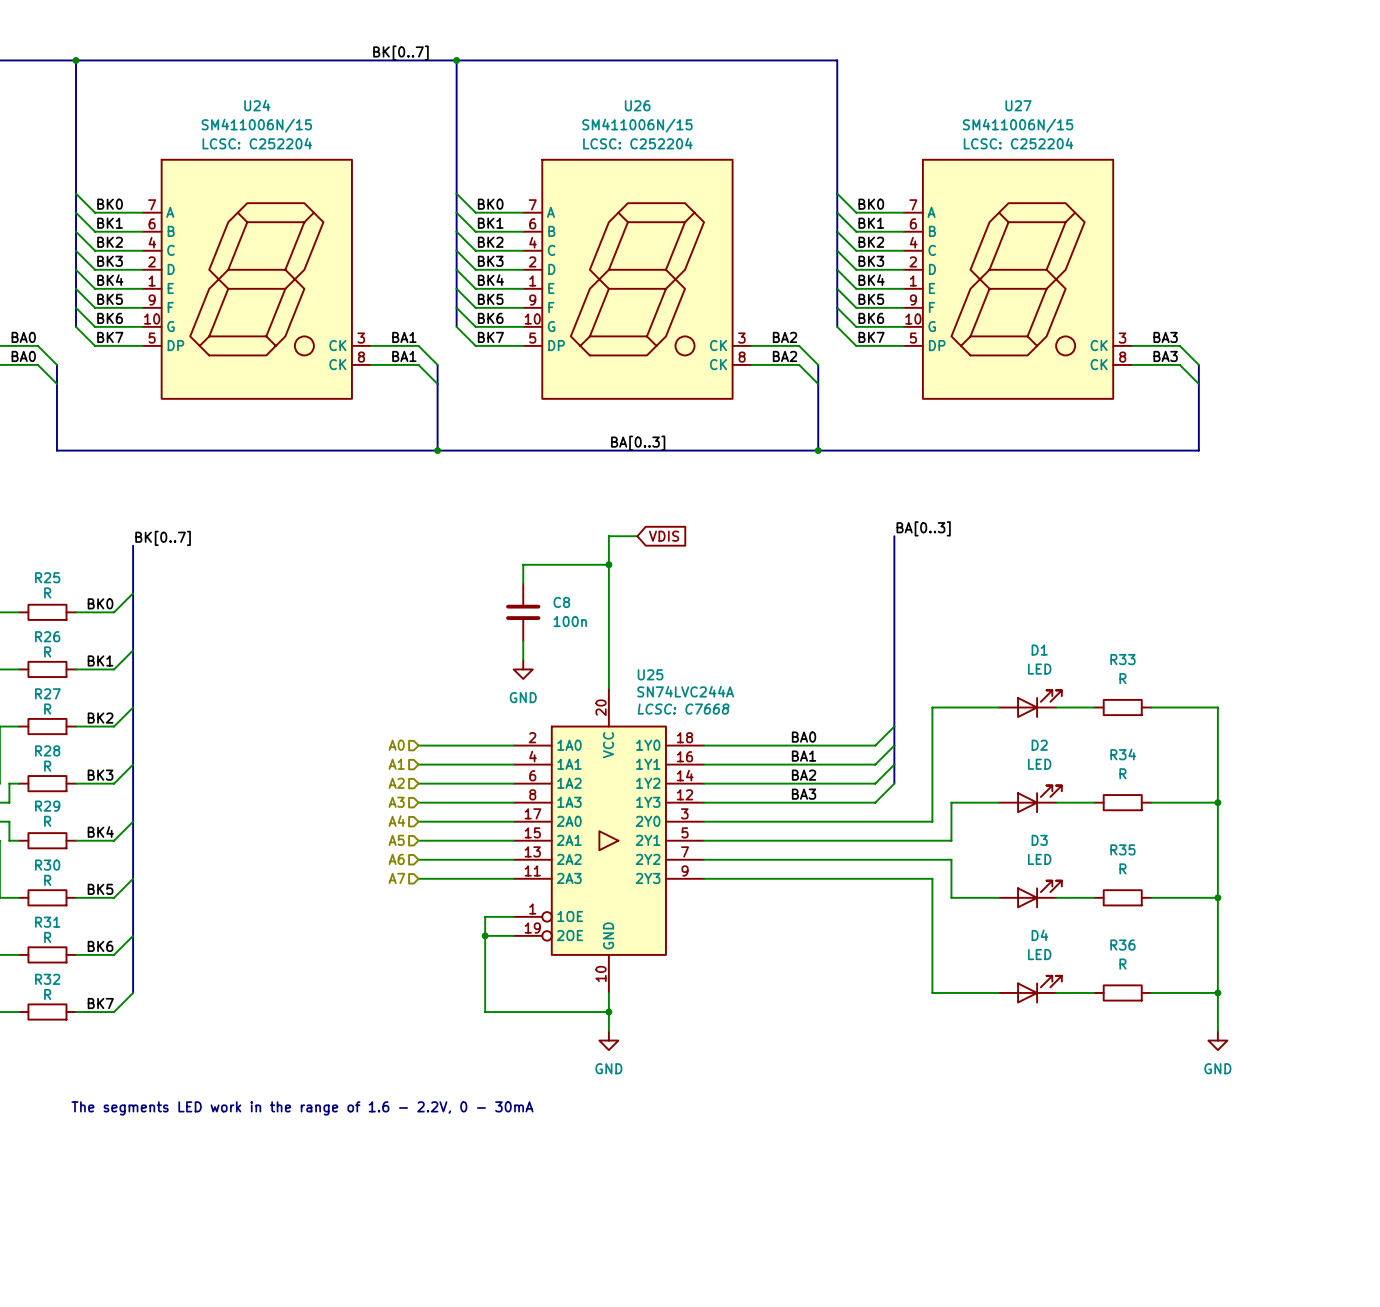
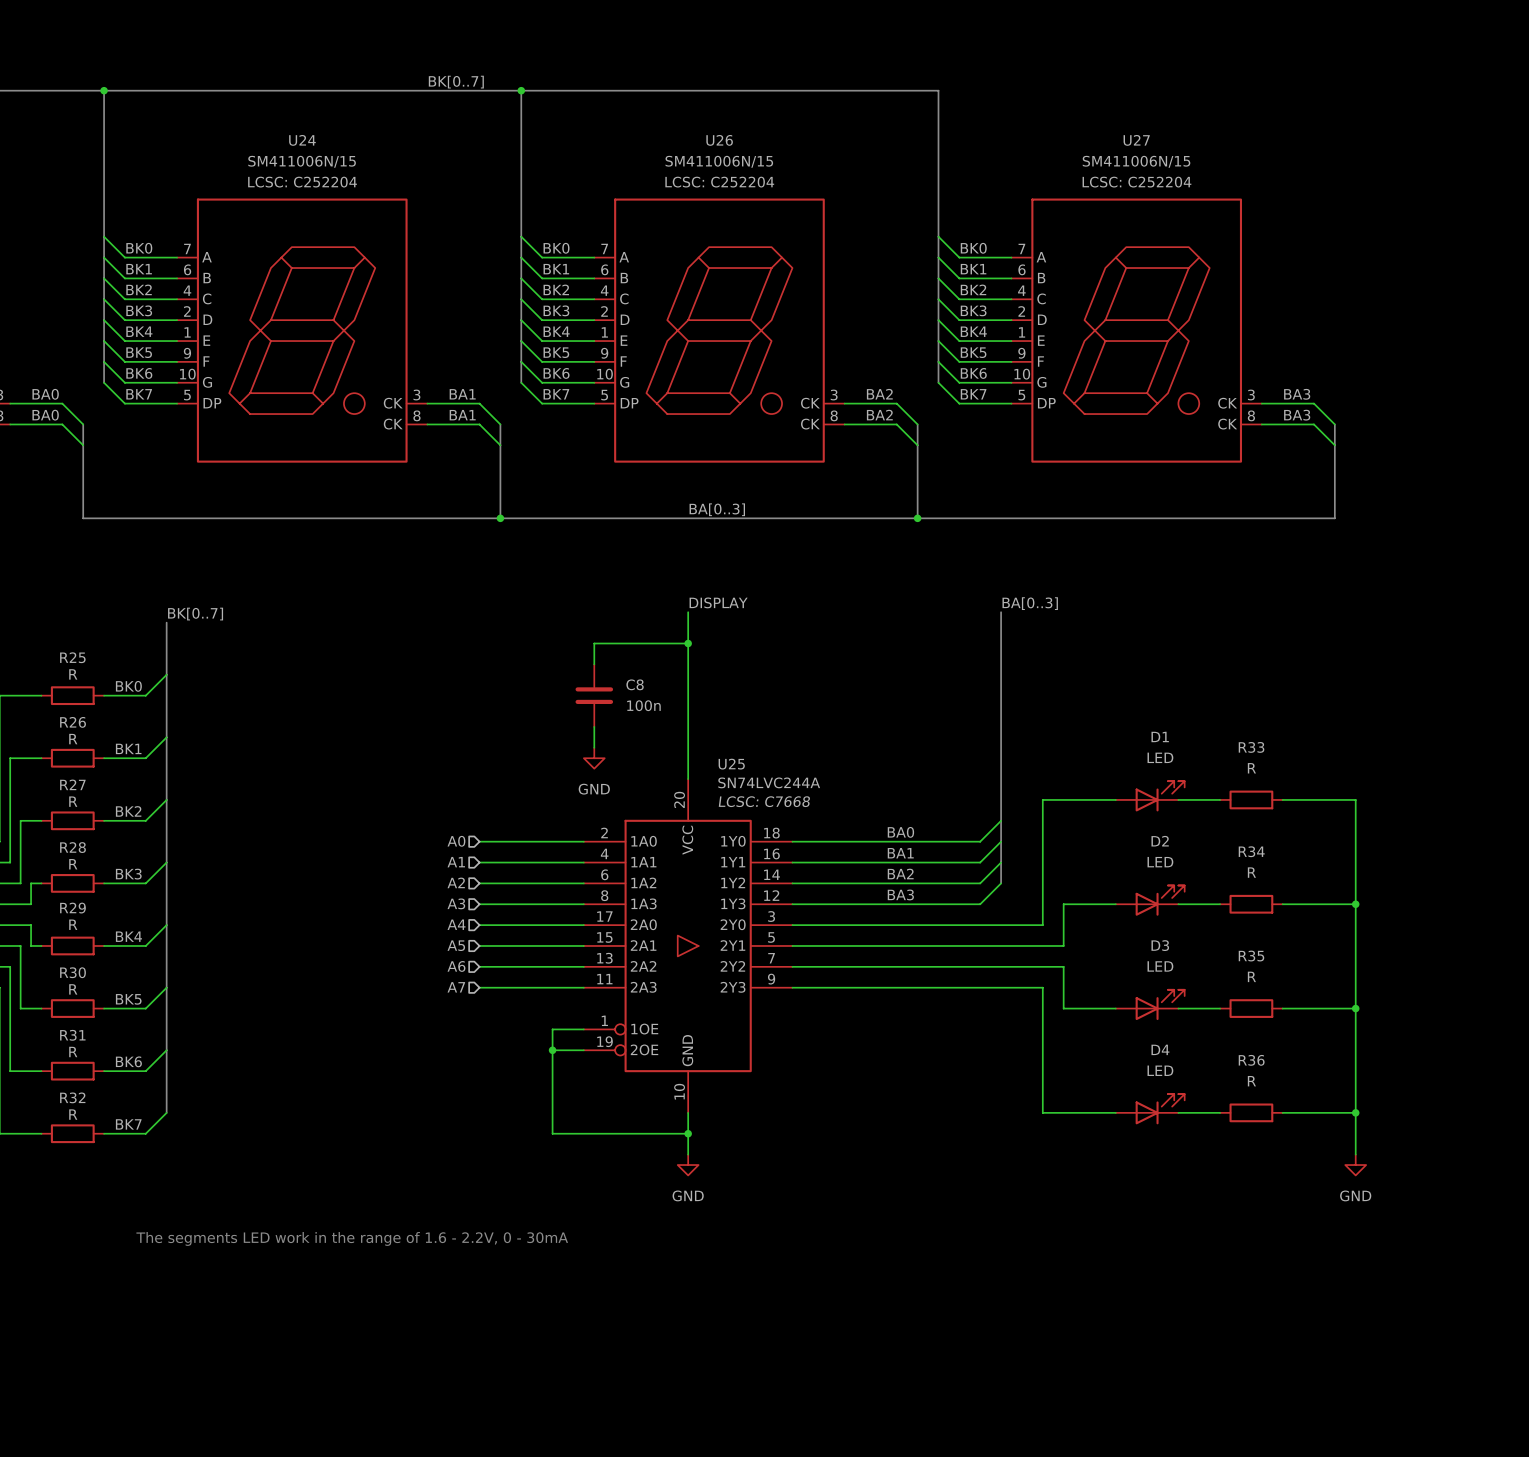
label: none -> DISPLAY (718, 602)
wire: (608, 536) (637, 536) -> none
global label: VDIS (664, 536) -> none

